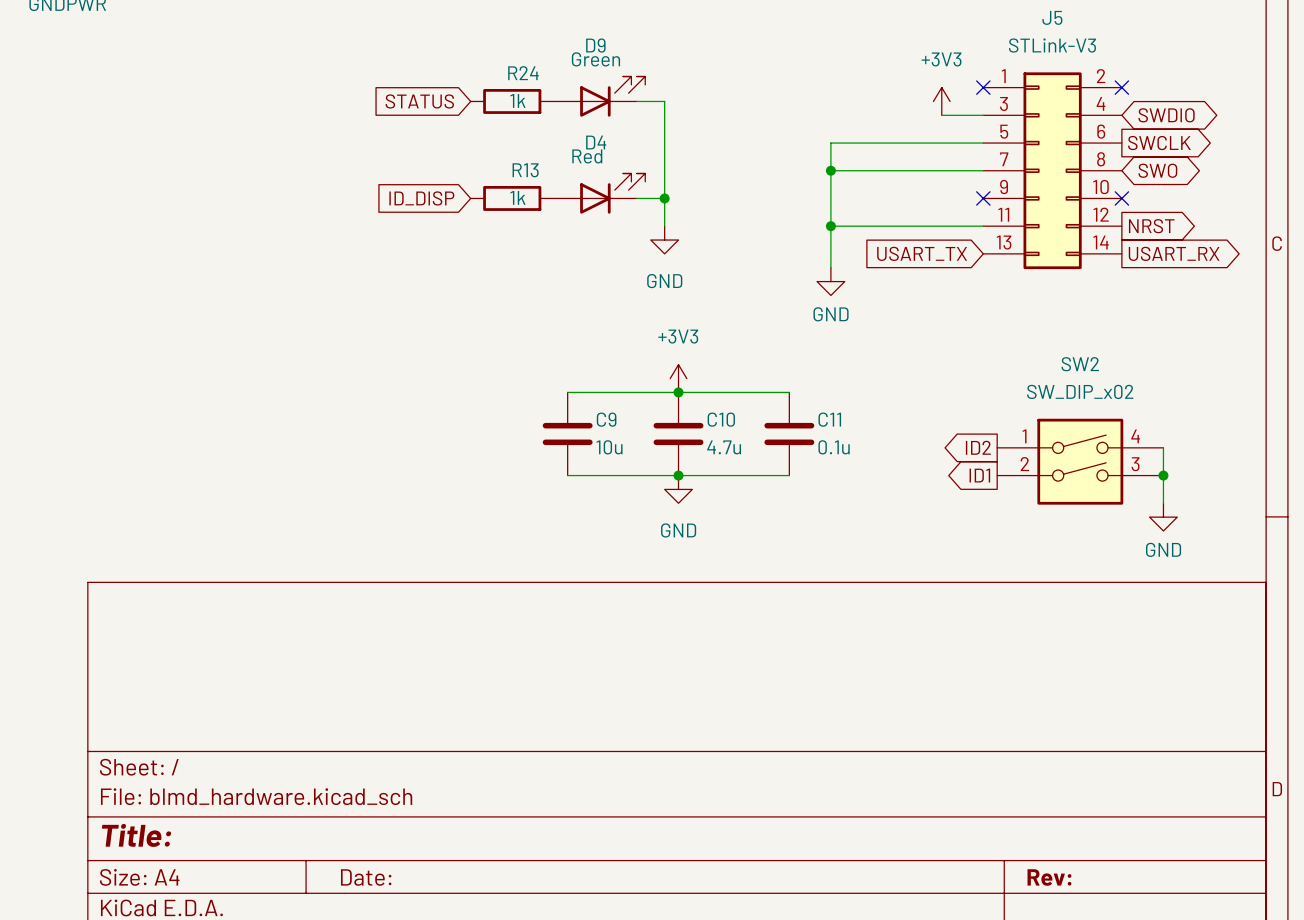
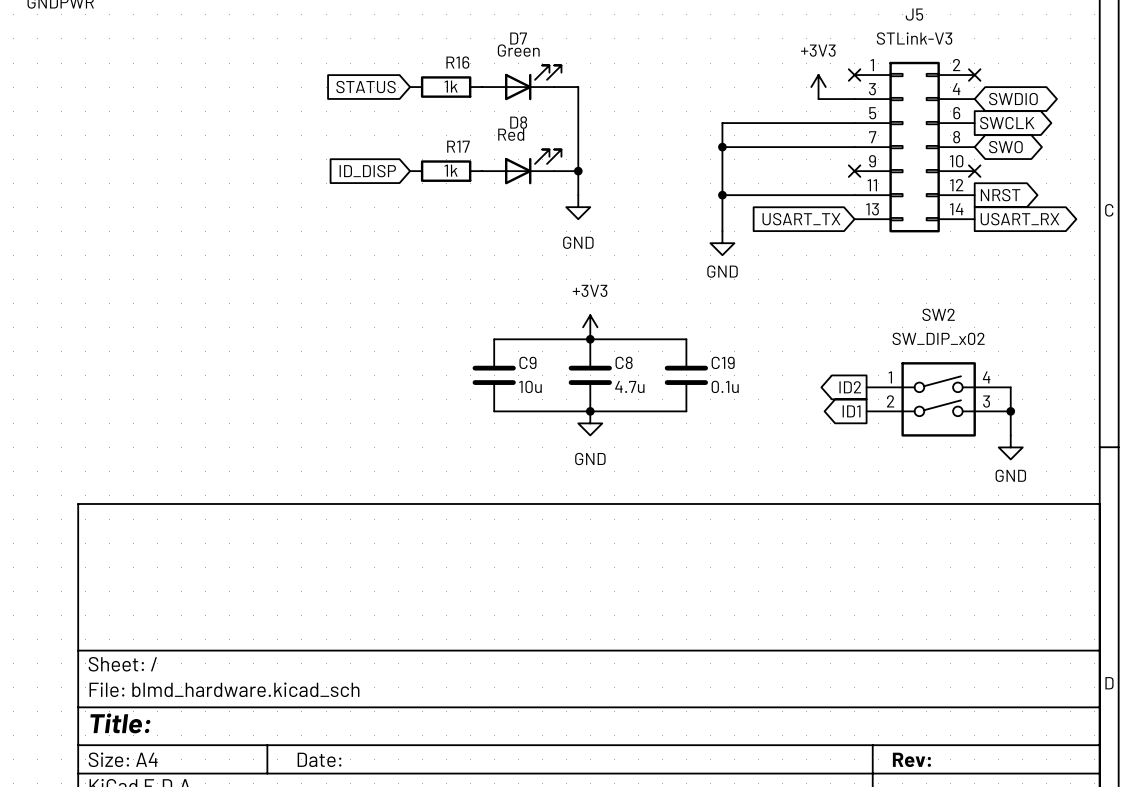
D9 name: D9 (595, 45) -> D7 (518, 38)
R24 name: R24 (523, 73) -> R16 (457, 62)
D4 name: D4 (596, 142) -> D8 (518, 122)
R13 name: R13 (525, 170) -> R17 (458, 146)
C10 name: C10 (721, 419) -> C8 (624, 362)
C11 name: C11 (829, 419) -> C19 (723, 362)

